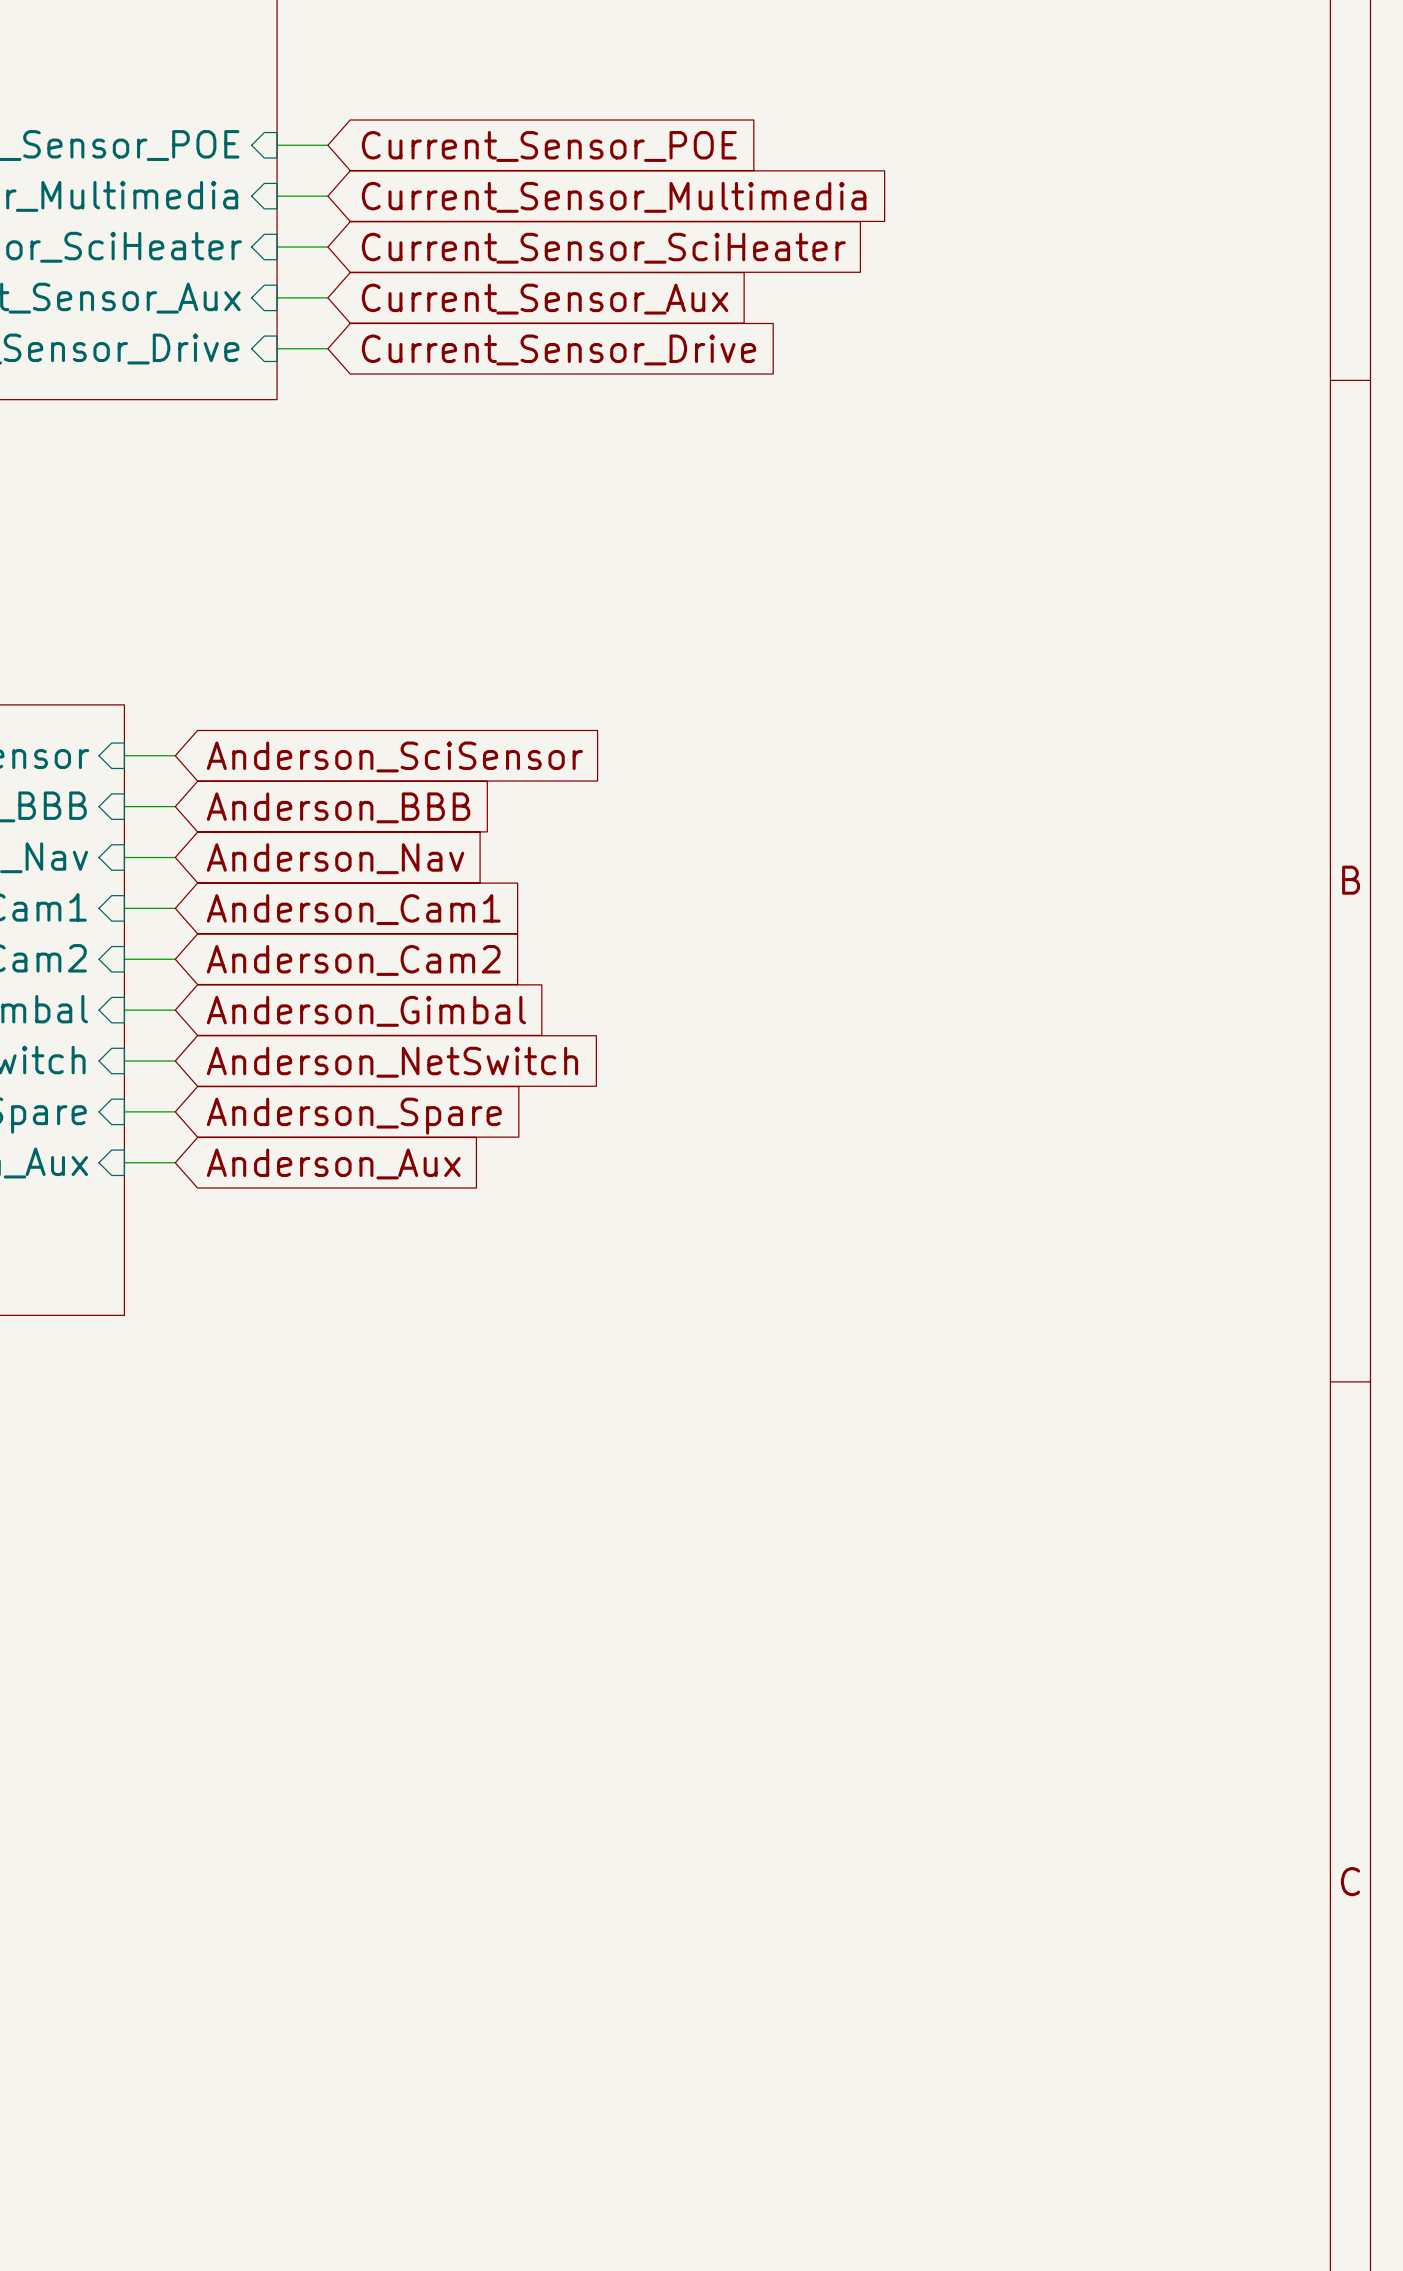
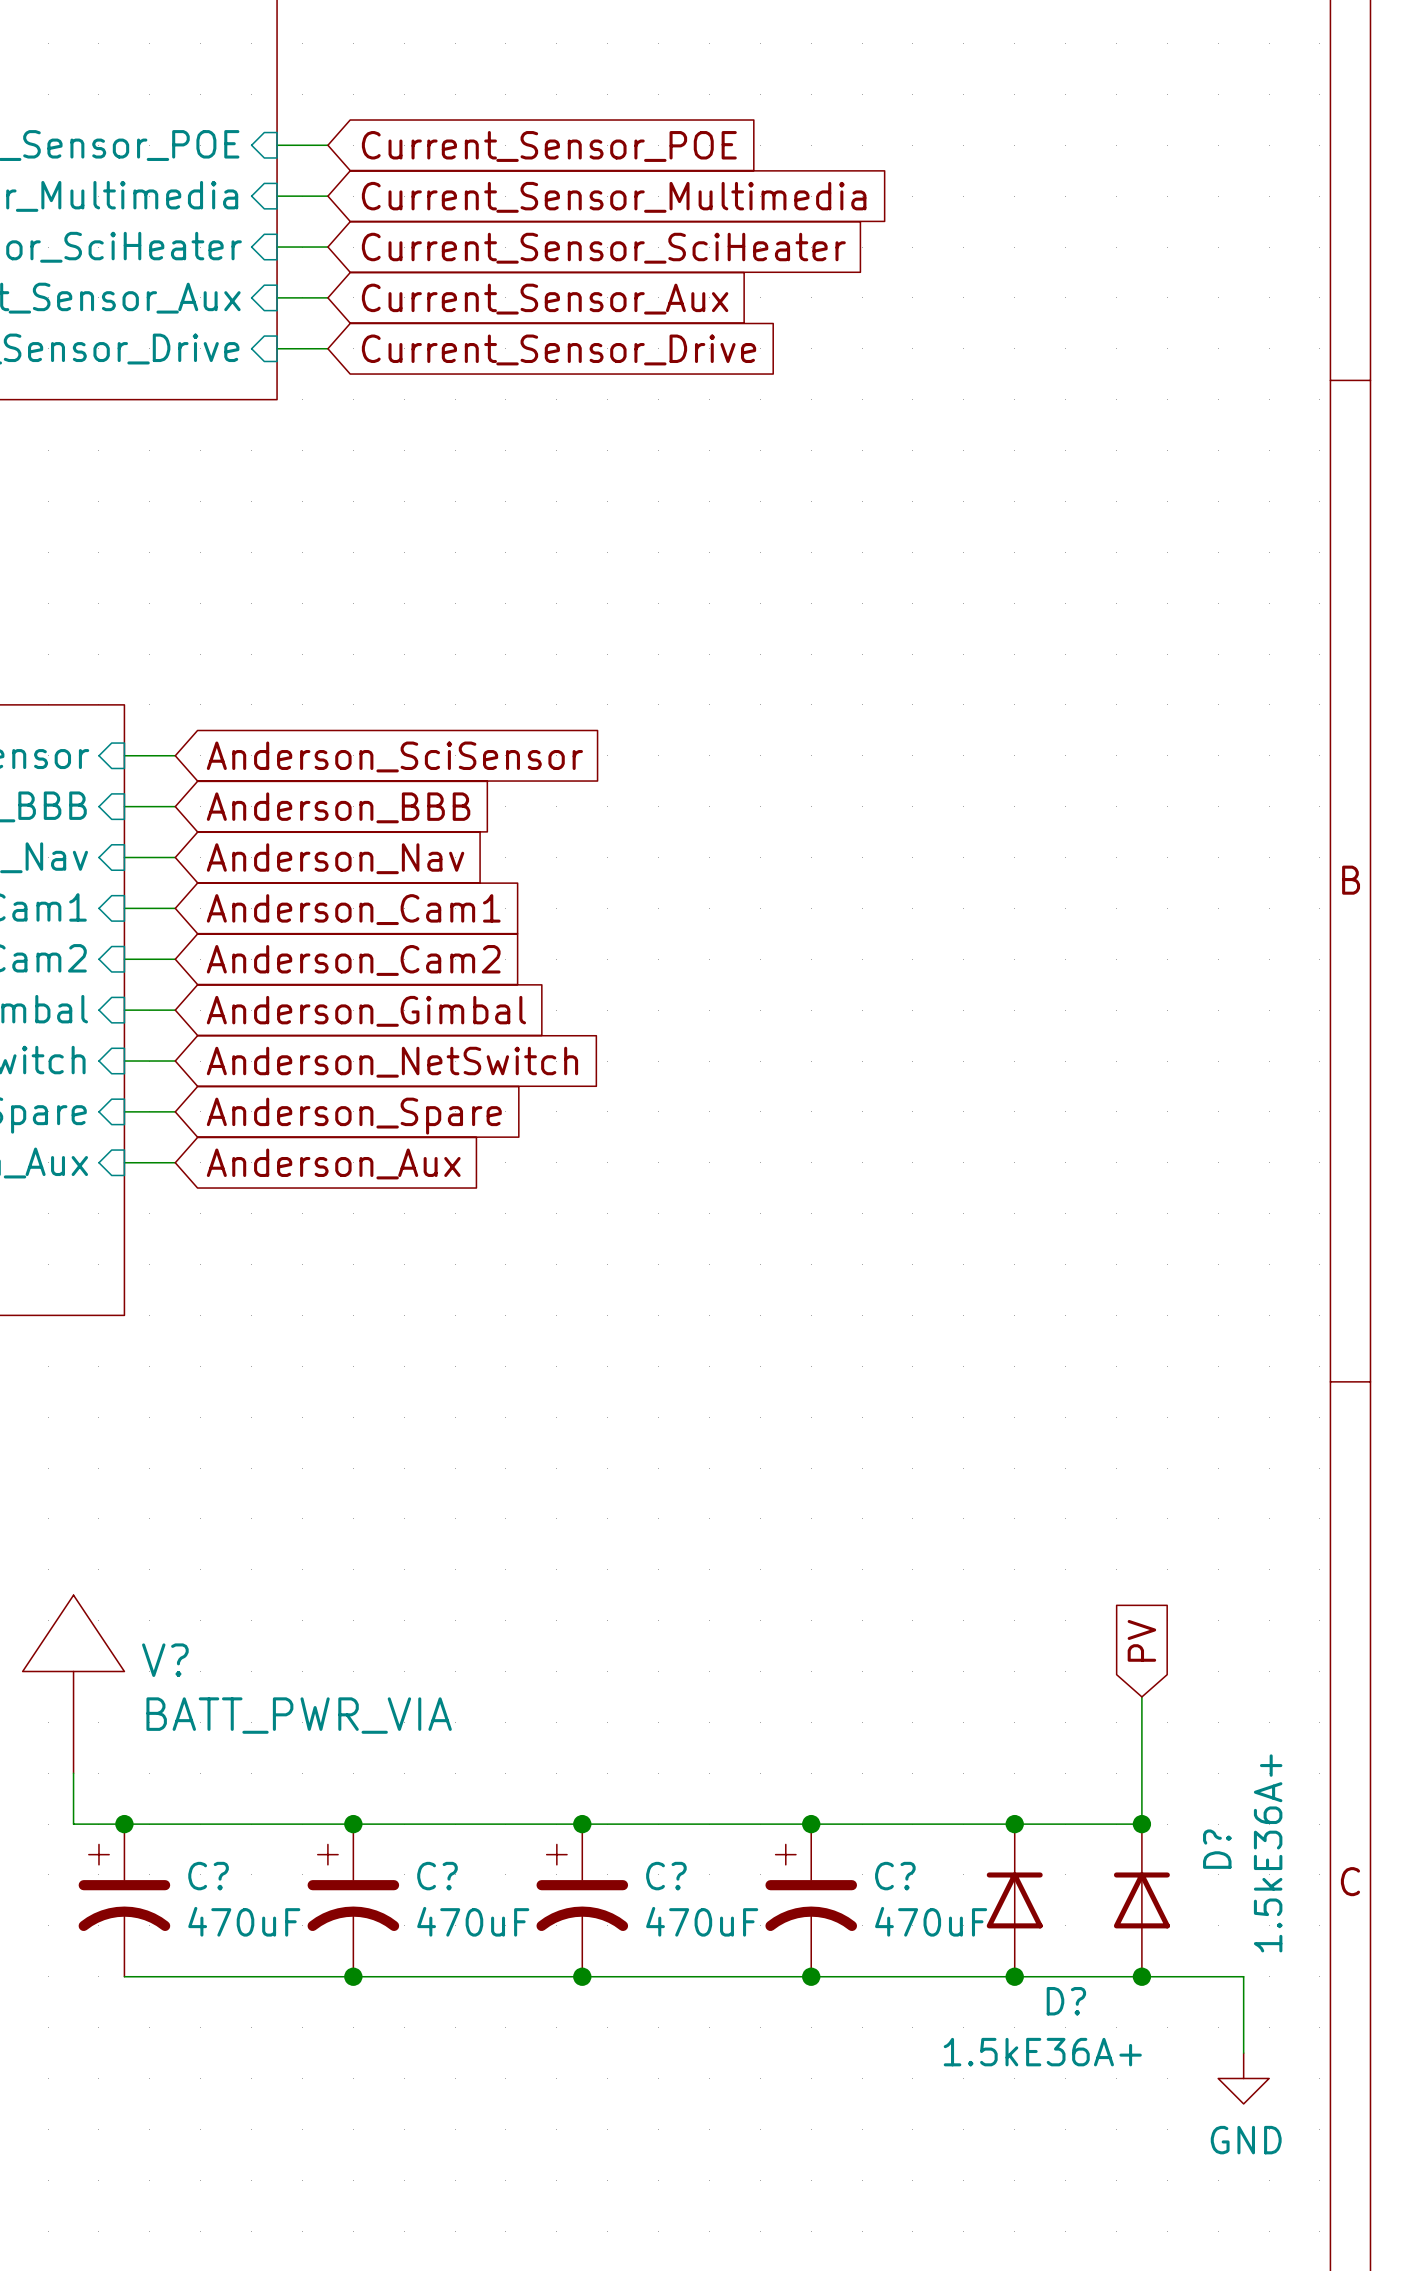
global label: none -> PV (1141, 1640)
V?: none -> BATT_PWR_VIA (73, 1684)
wire: none -> (1141, 1696) (1141, 1824) (73, 1824) (73, 1773)
junction: none -> (124, 1824)
junction: none -> (353, 1824)
junction: none -> (582, 1824)
junction: none -> (811, 1824)
junction: none -> (1014, 1824)
junction: none -> (1141, 1824)
C?: none -> 470uF (124, 1900)
C?: none -> 470uF (353, 1900)
C?: none -> 470uF (582, 1900)
C?: none -> 470uF (811, 1900)
D?: none -> 1.5kE36A+ (1014, 1900)
D?: none -> 1.5kE36A+ (1141, 1900)
wire: none -> (124, 1976) (1243, 1976) (1243, 2053)
junction: none -> (353, 1976)
junction: none -> (582, 1976)
junction: none -> (811, 1976)
junction: none -> (1014, 1976)
junction: none -> (1141, 1976)
power symbol: none -> GND (1243, 2078)

